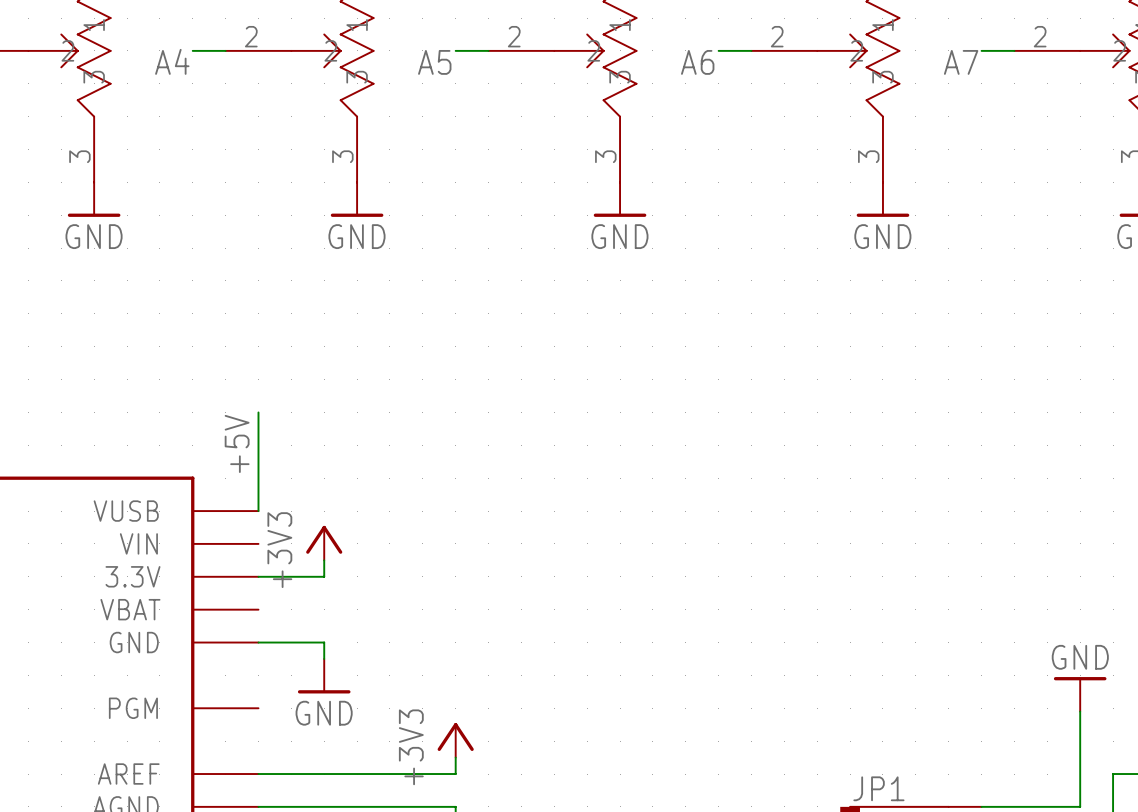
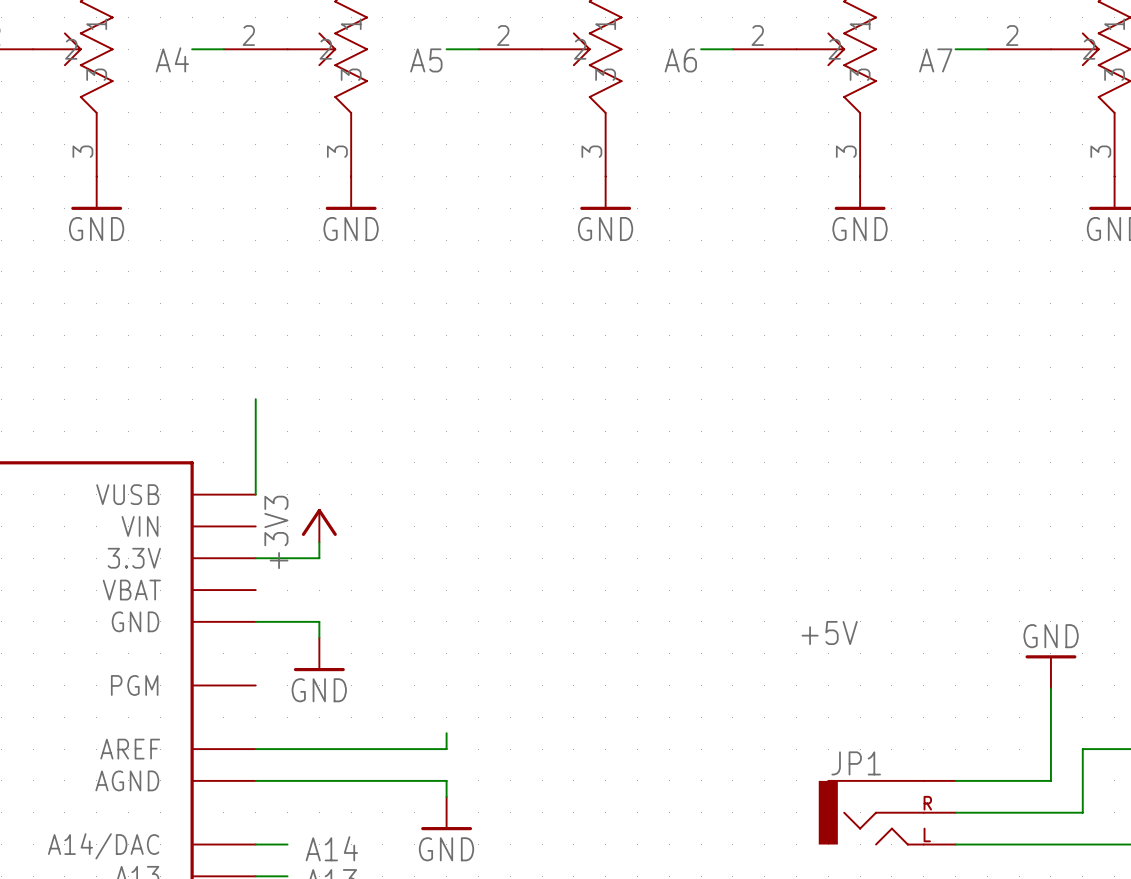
label: +5V (237, 443) -> none
label: none -> +5V (829, 632)
power symbol: +3V3 (455, 740) -> none

